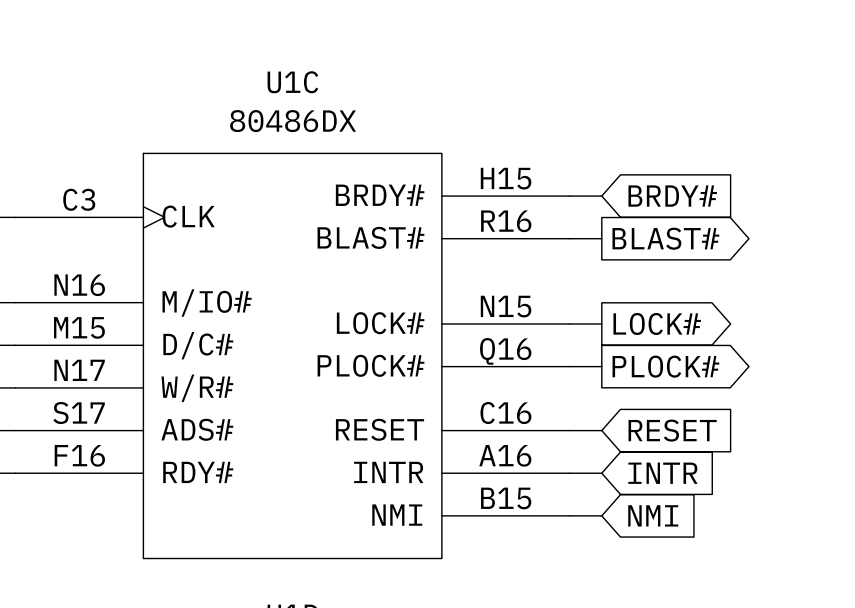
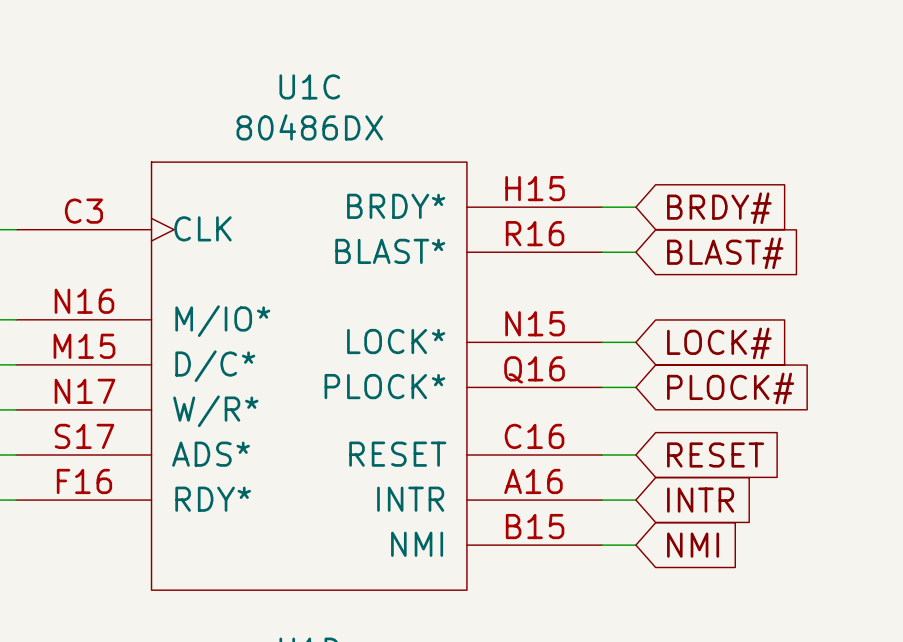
U1C symbol: [15, 153, 570, 559] -> [16, 162, 603, 591]
global label shape: output (665, 238) -> input (725, 253)
global label shape: output (657, 323) -> input (719, 343)
global label shape: output (665, 366) -> input (730, 388)

